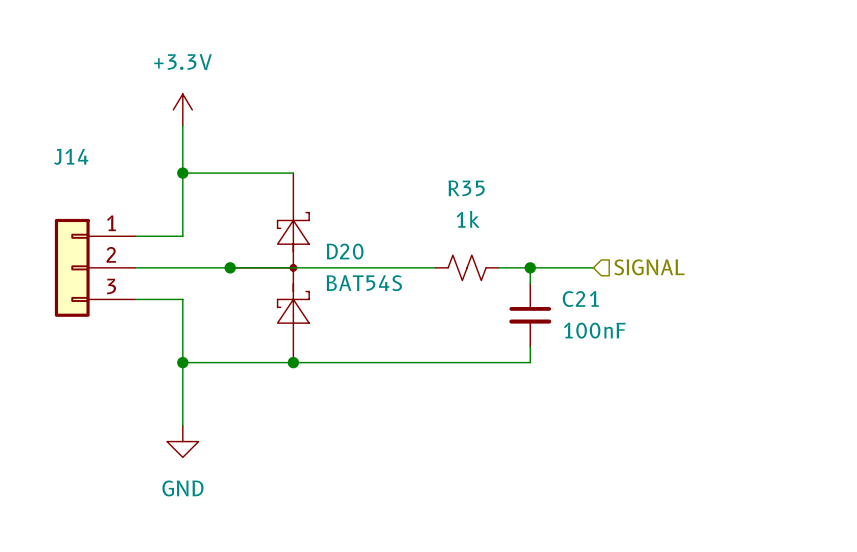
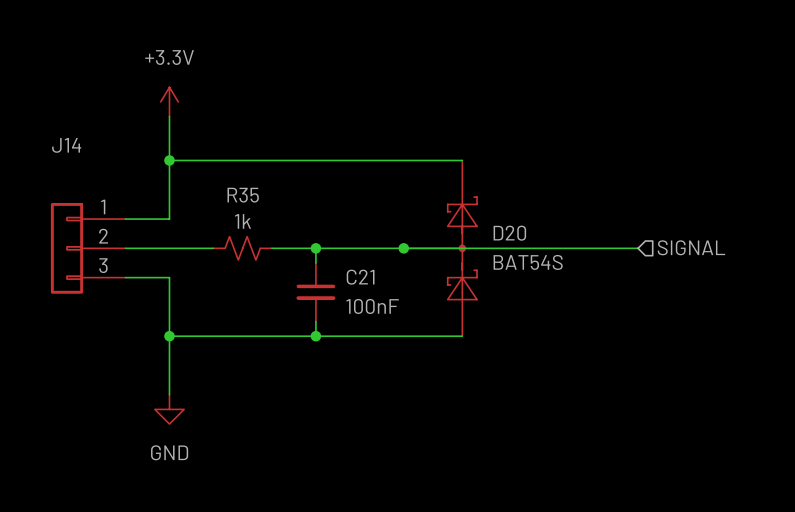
wire: none -> (271, 160) (462, 160)
R35 name position: R35 (466, 188) -> R35 (243, 195)
R35 value position: 1k (468, 219) -> 1k (242, 221)
junction: (230, 267) -> none
D20 position: (269, 267) -> (440, 248)
junction: none -> (315, 248)
junction: none -> (403, 248)
R35 position: (467, 267) -> (242, 248)
wire: (530, 267) (530, 283) -> (315, 248) (315, 262)
junction: (530, 267) -> none
wire: none -> (550, 248) (638, 248)
hierarchical label position: SIGNAL (649, 267) -> SIGNAL (691, 247)
C21 position: (530, 315) -> (315, 292)
wire: none -> (315, 321) (315, 336)
wire: (530, 346) (530, 362) (498, 362) -> none
junction position: (293, 362) -> (315, 336)

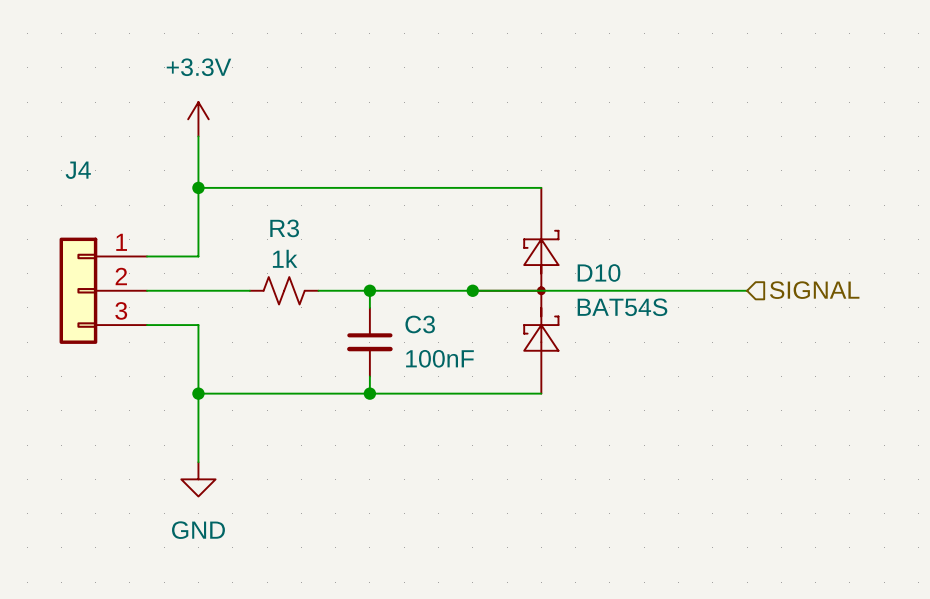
J14 name: J14 (66, 145) -> J4 (78, 170)
R35 name: R35 (243, 195) -> R3 (284, 228)
D20 name: D20 (509, 233) -> D10 (599, 272)
C21 name: C21 (360, 277) -> C3 (420, 324)

